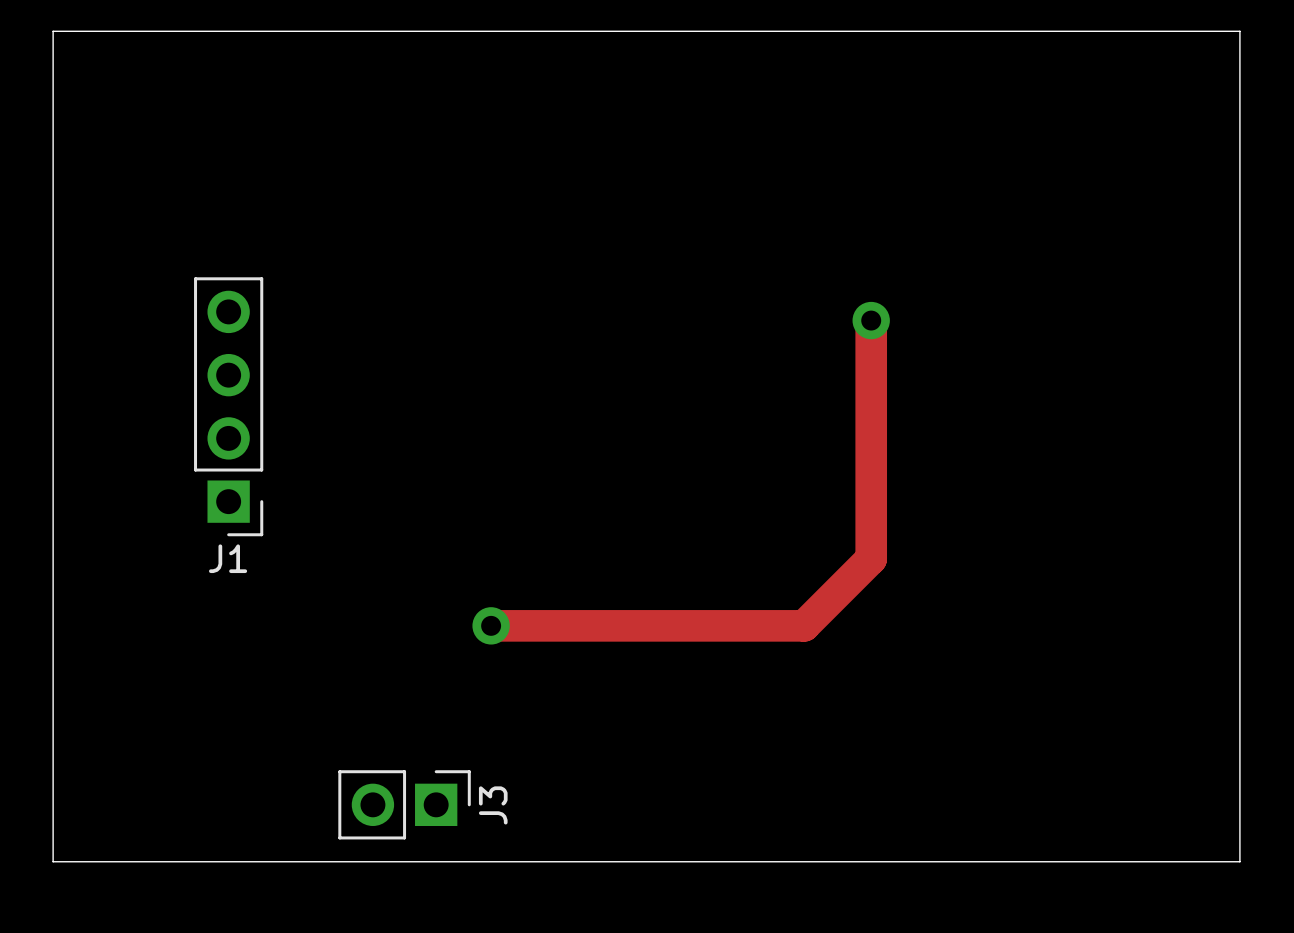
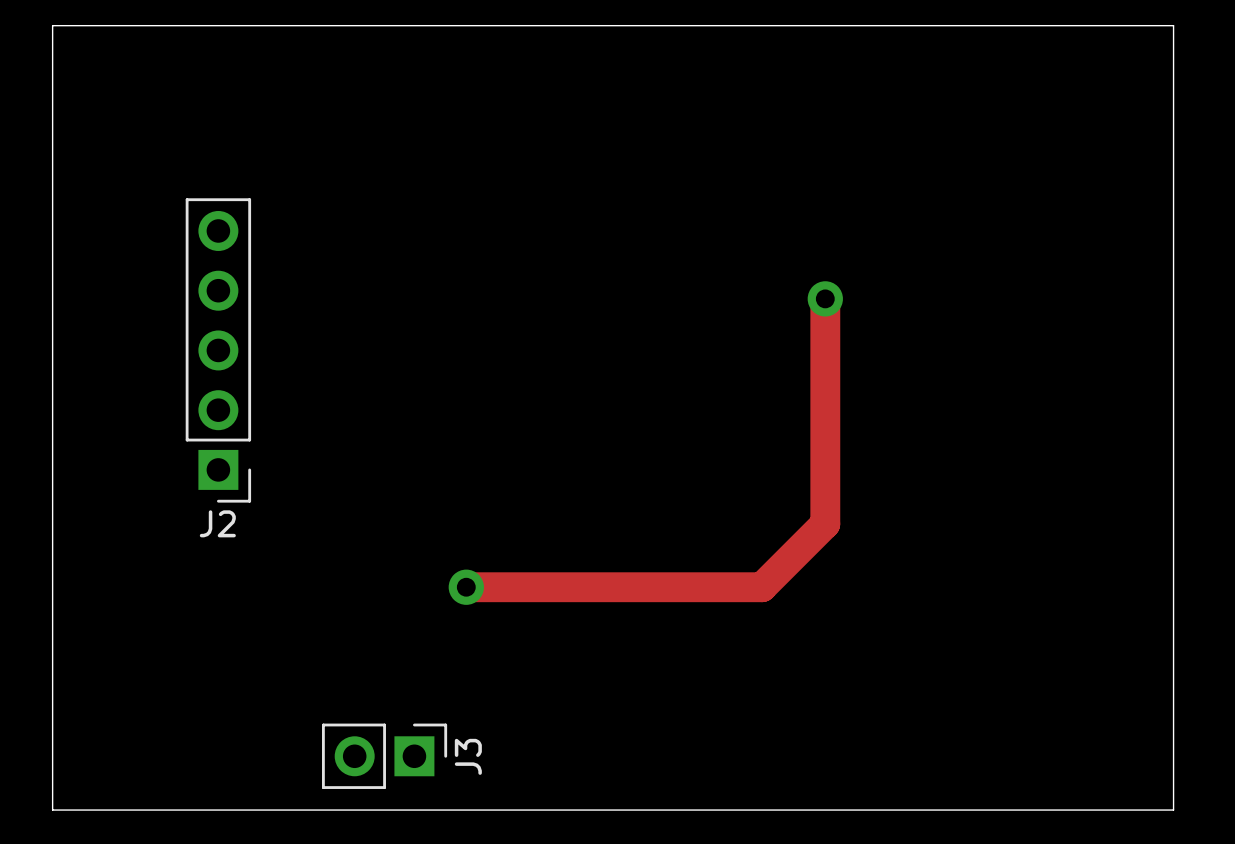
J2: none -> (218, 350)
J1: (228, 406) -> none

